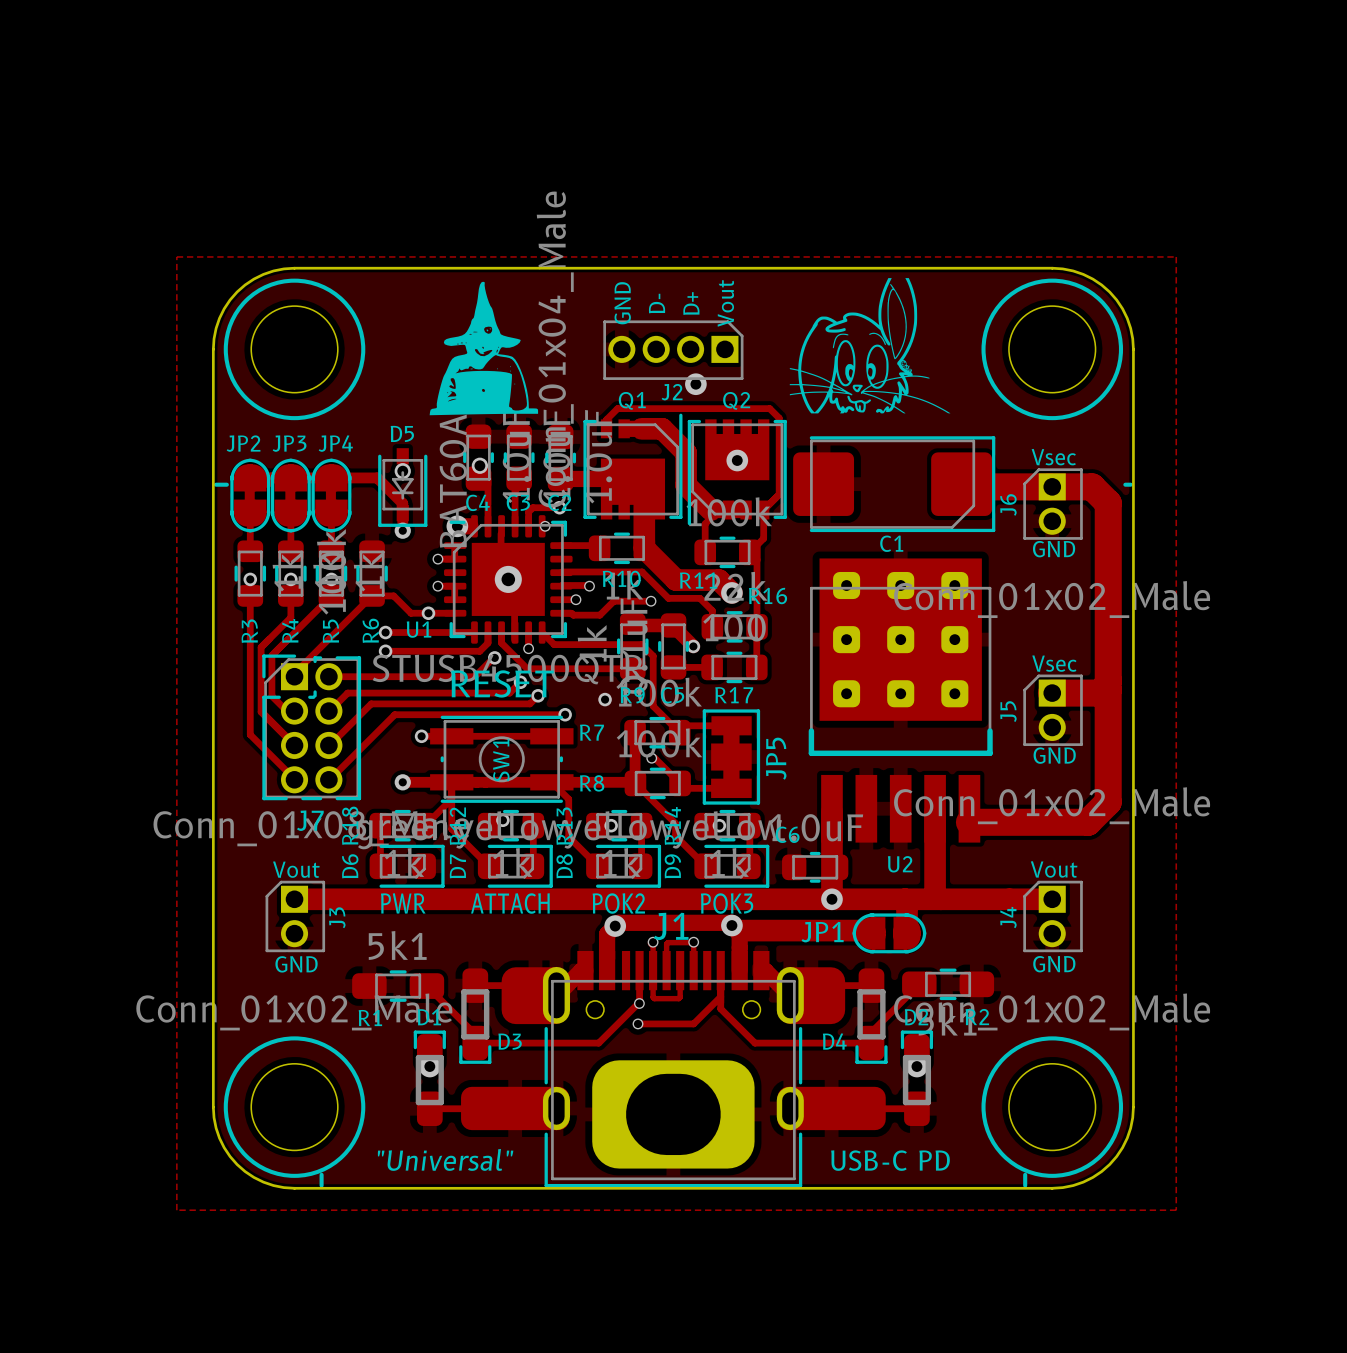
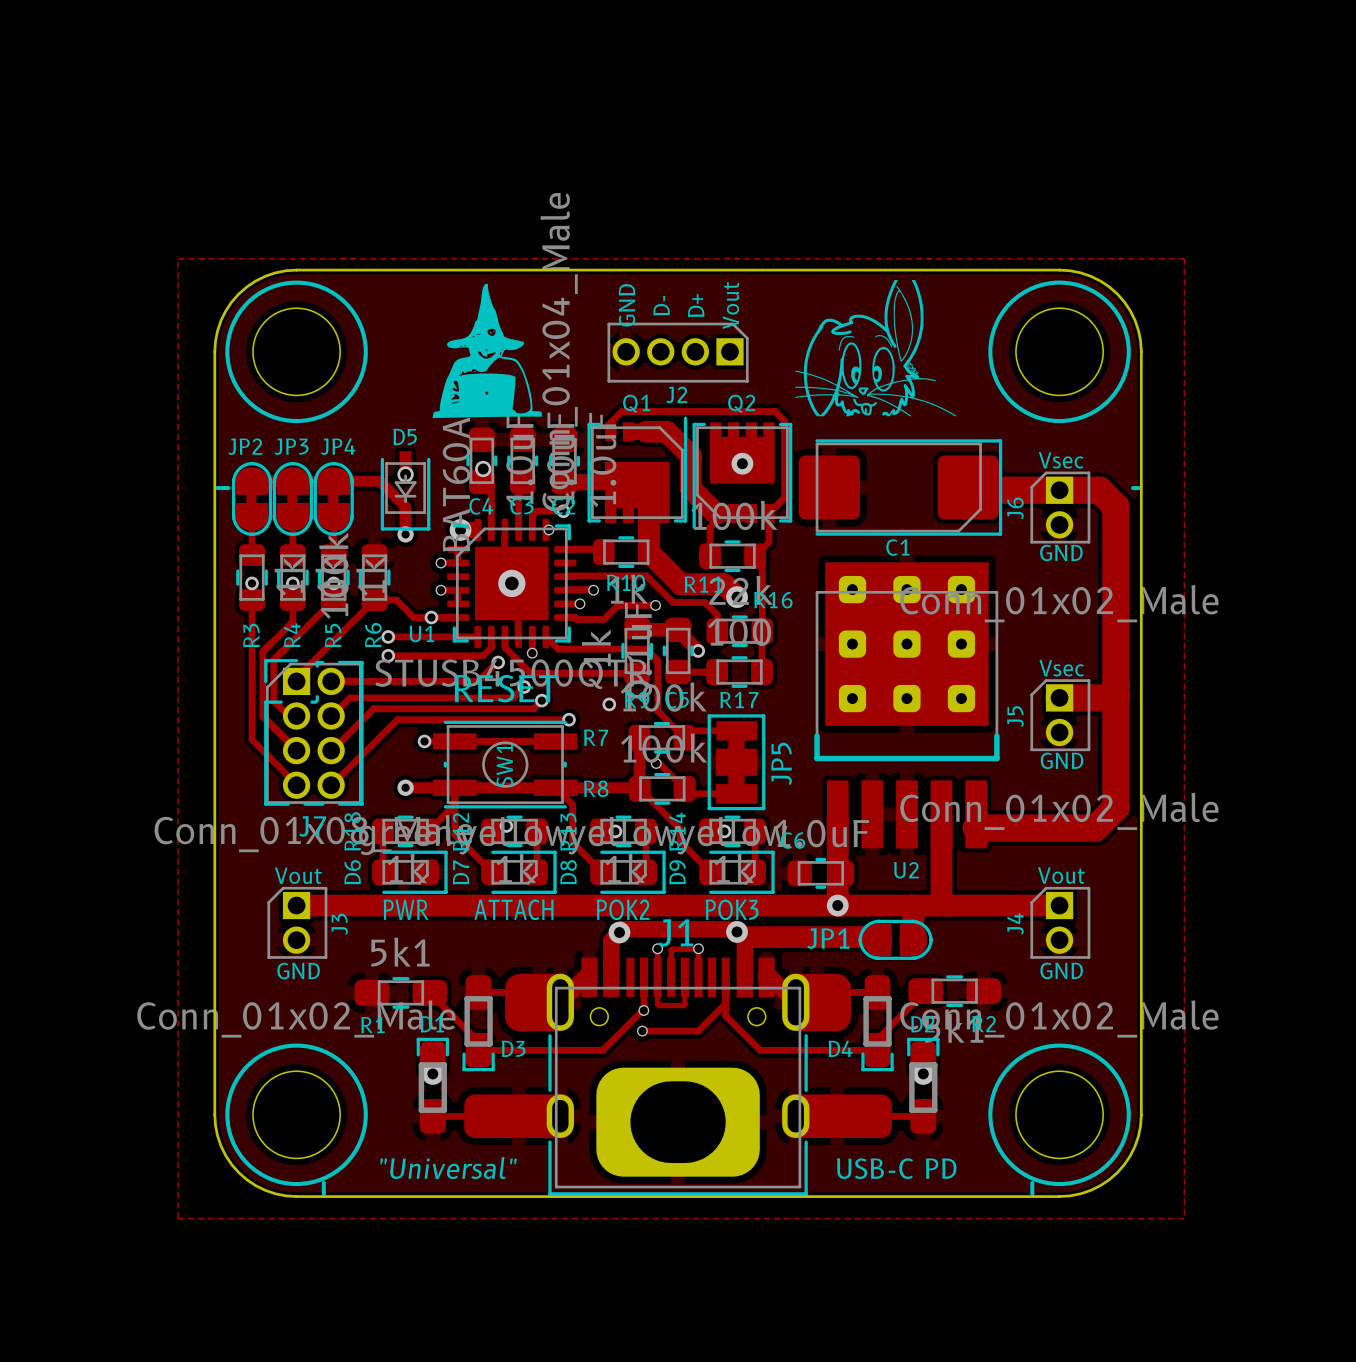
via: (695, 384) -> none

